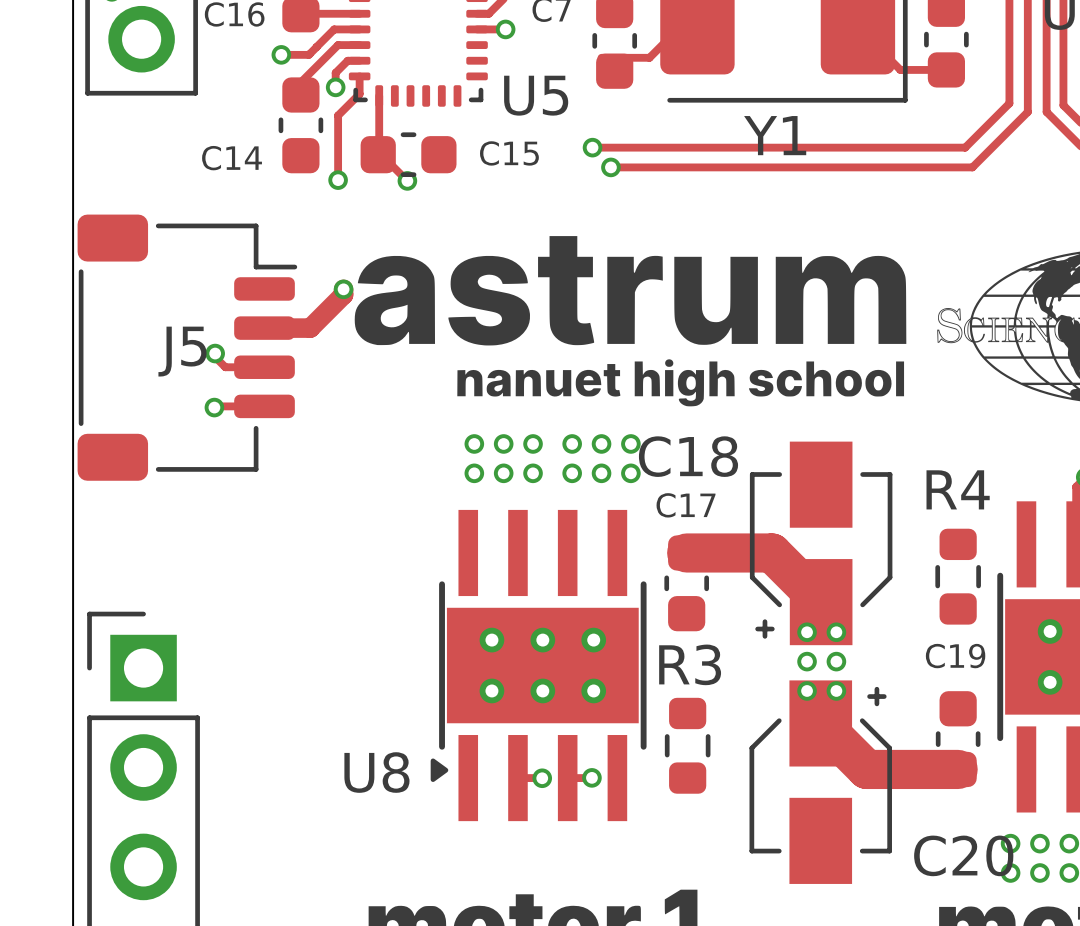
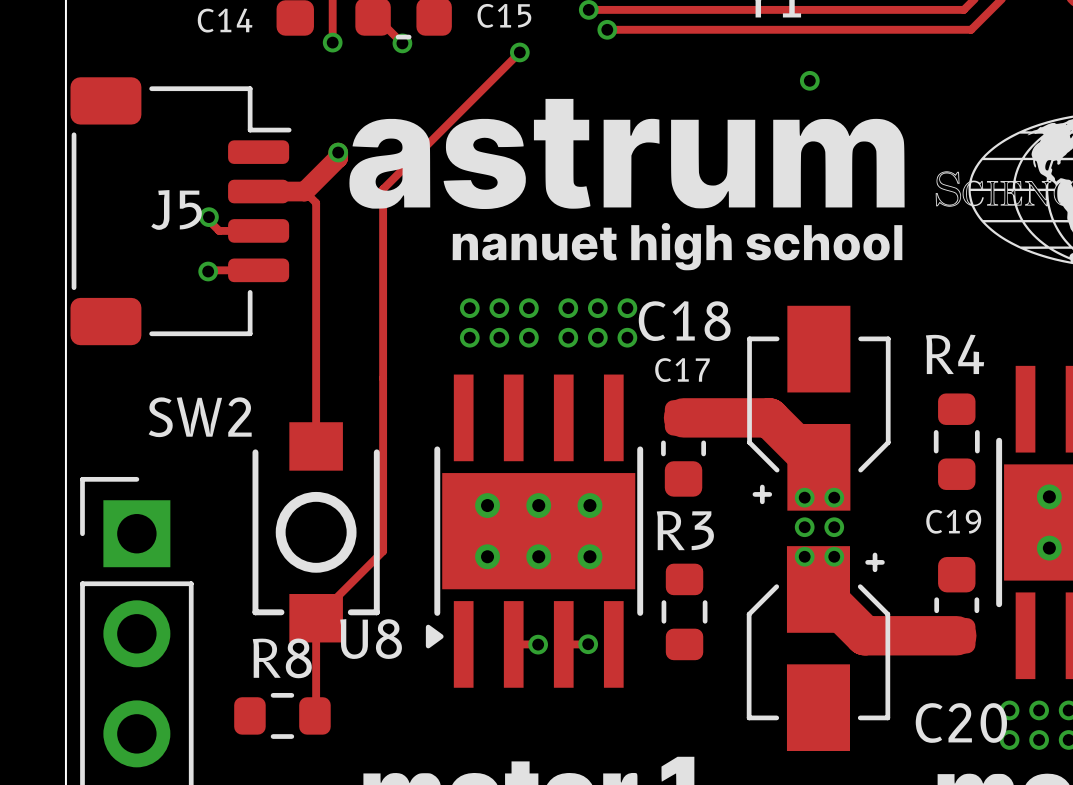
track: none -> (519, 52) (383, 189) (383, 551) (316, 618) (314, 715)
via: none -> (519, 52)
via: none -> (809, 80)
track: none -> (304, 191) (316, 202) (316, 446)
SW2: none -> (316, 532)
R8: none -> (282, 715)

